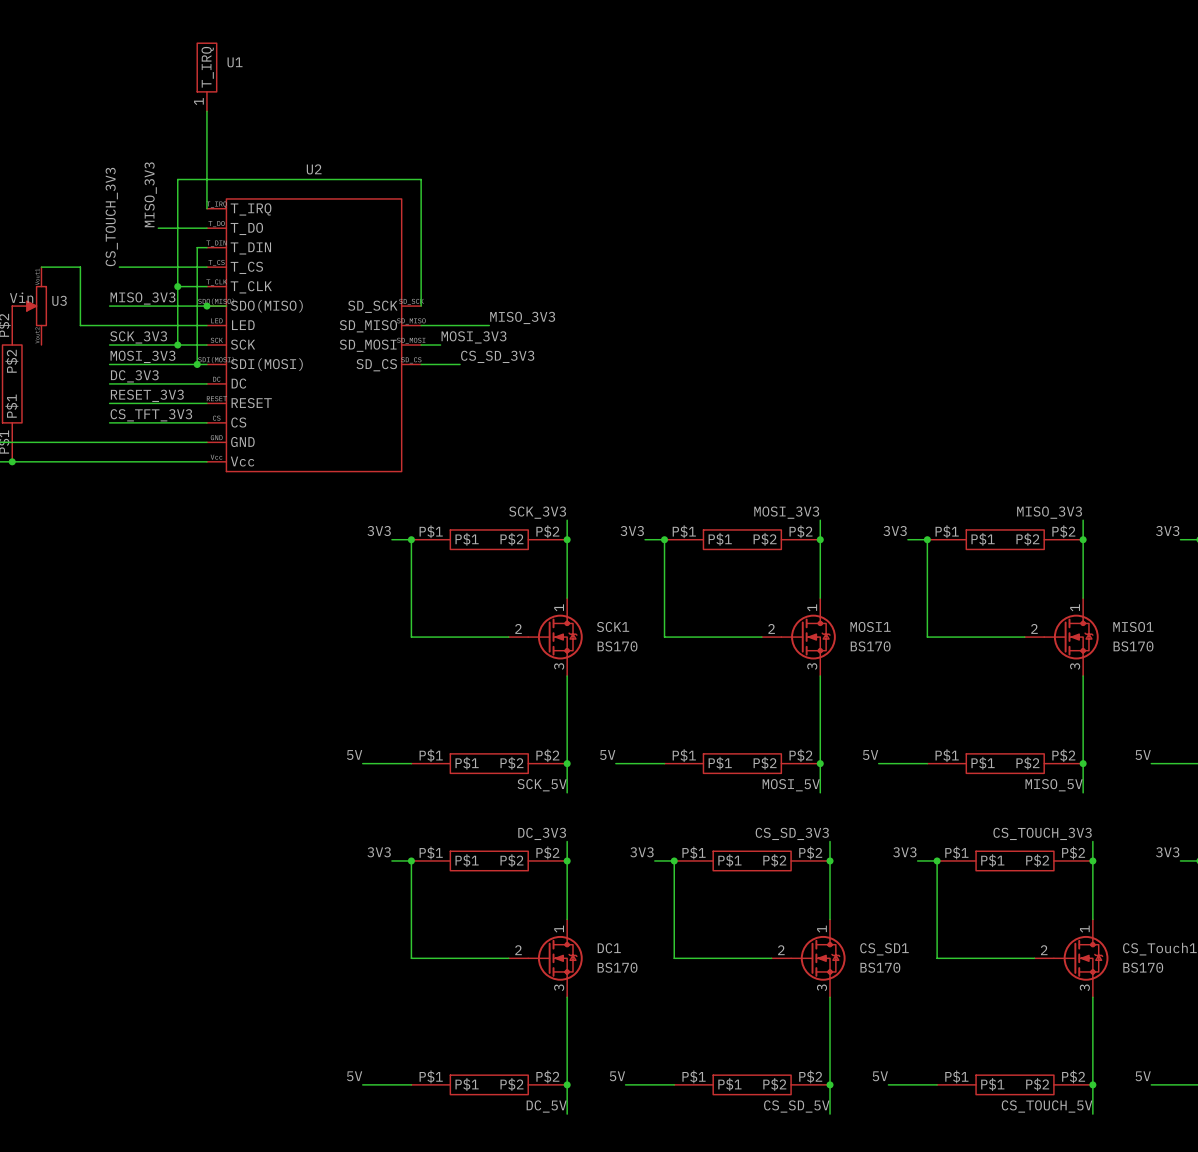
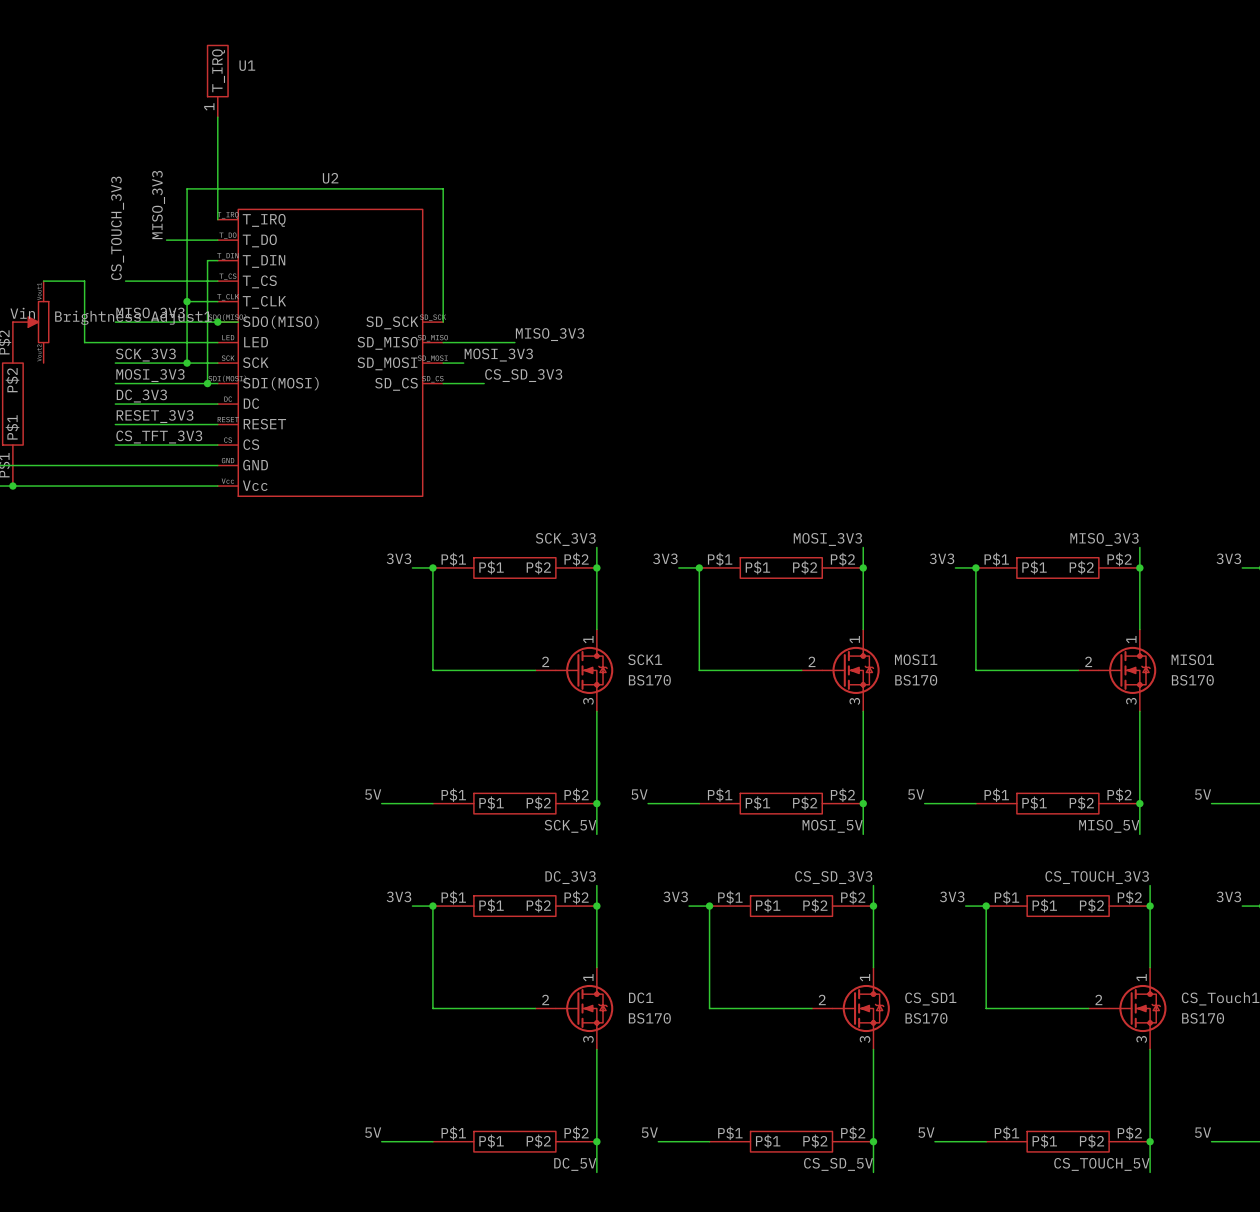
U3 name: U3 (59, 300) -> Brightness Adjust1 (133, 317)

